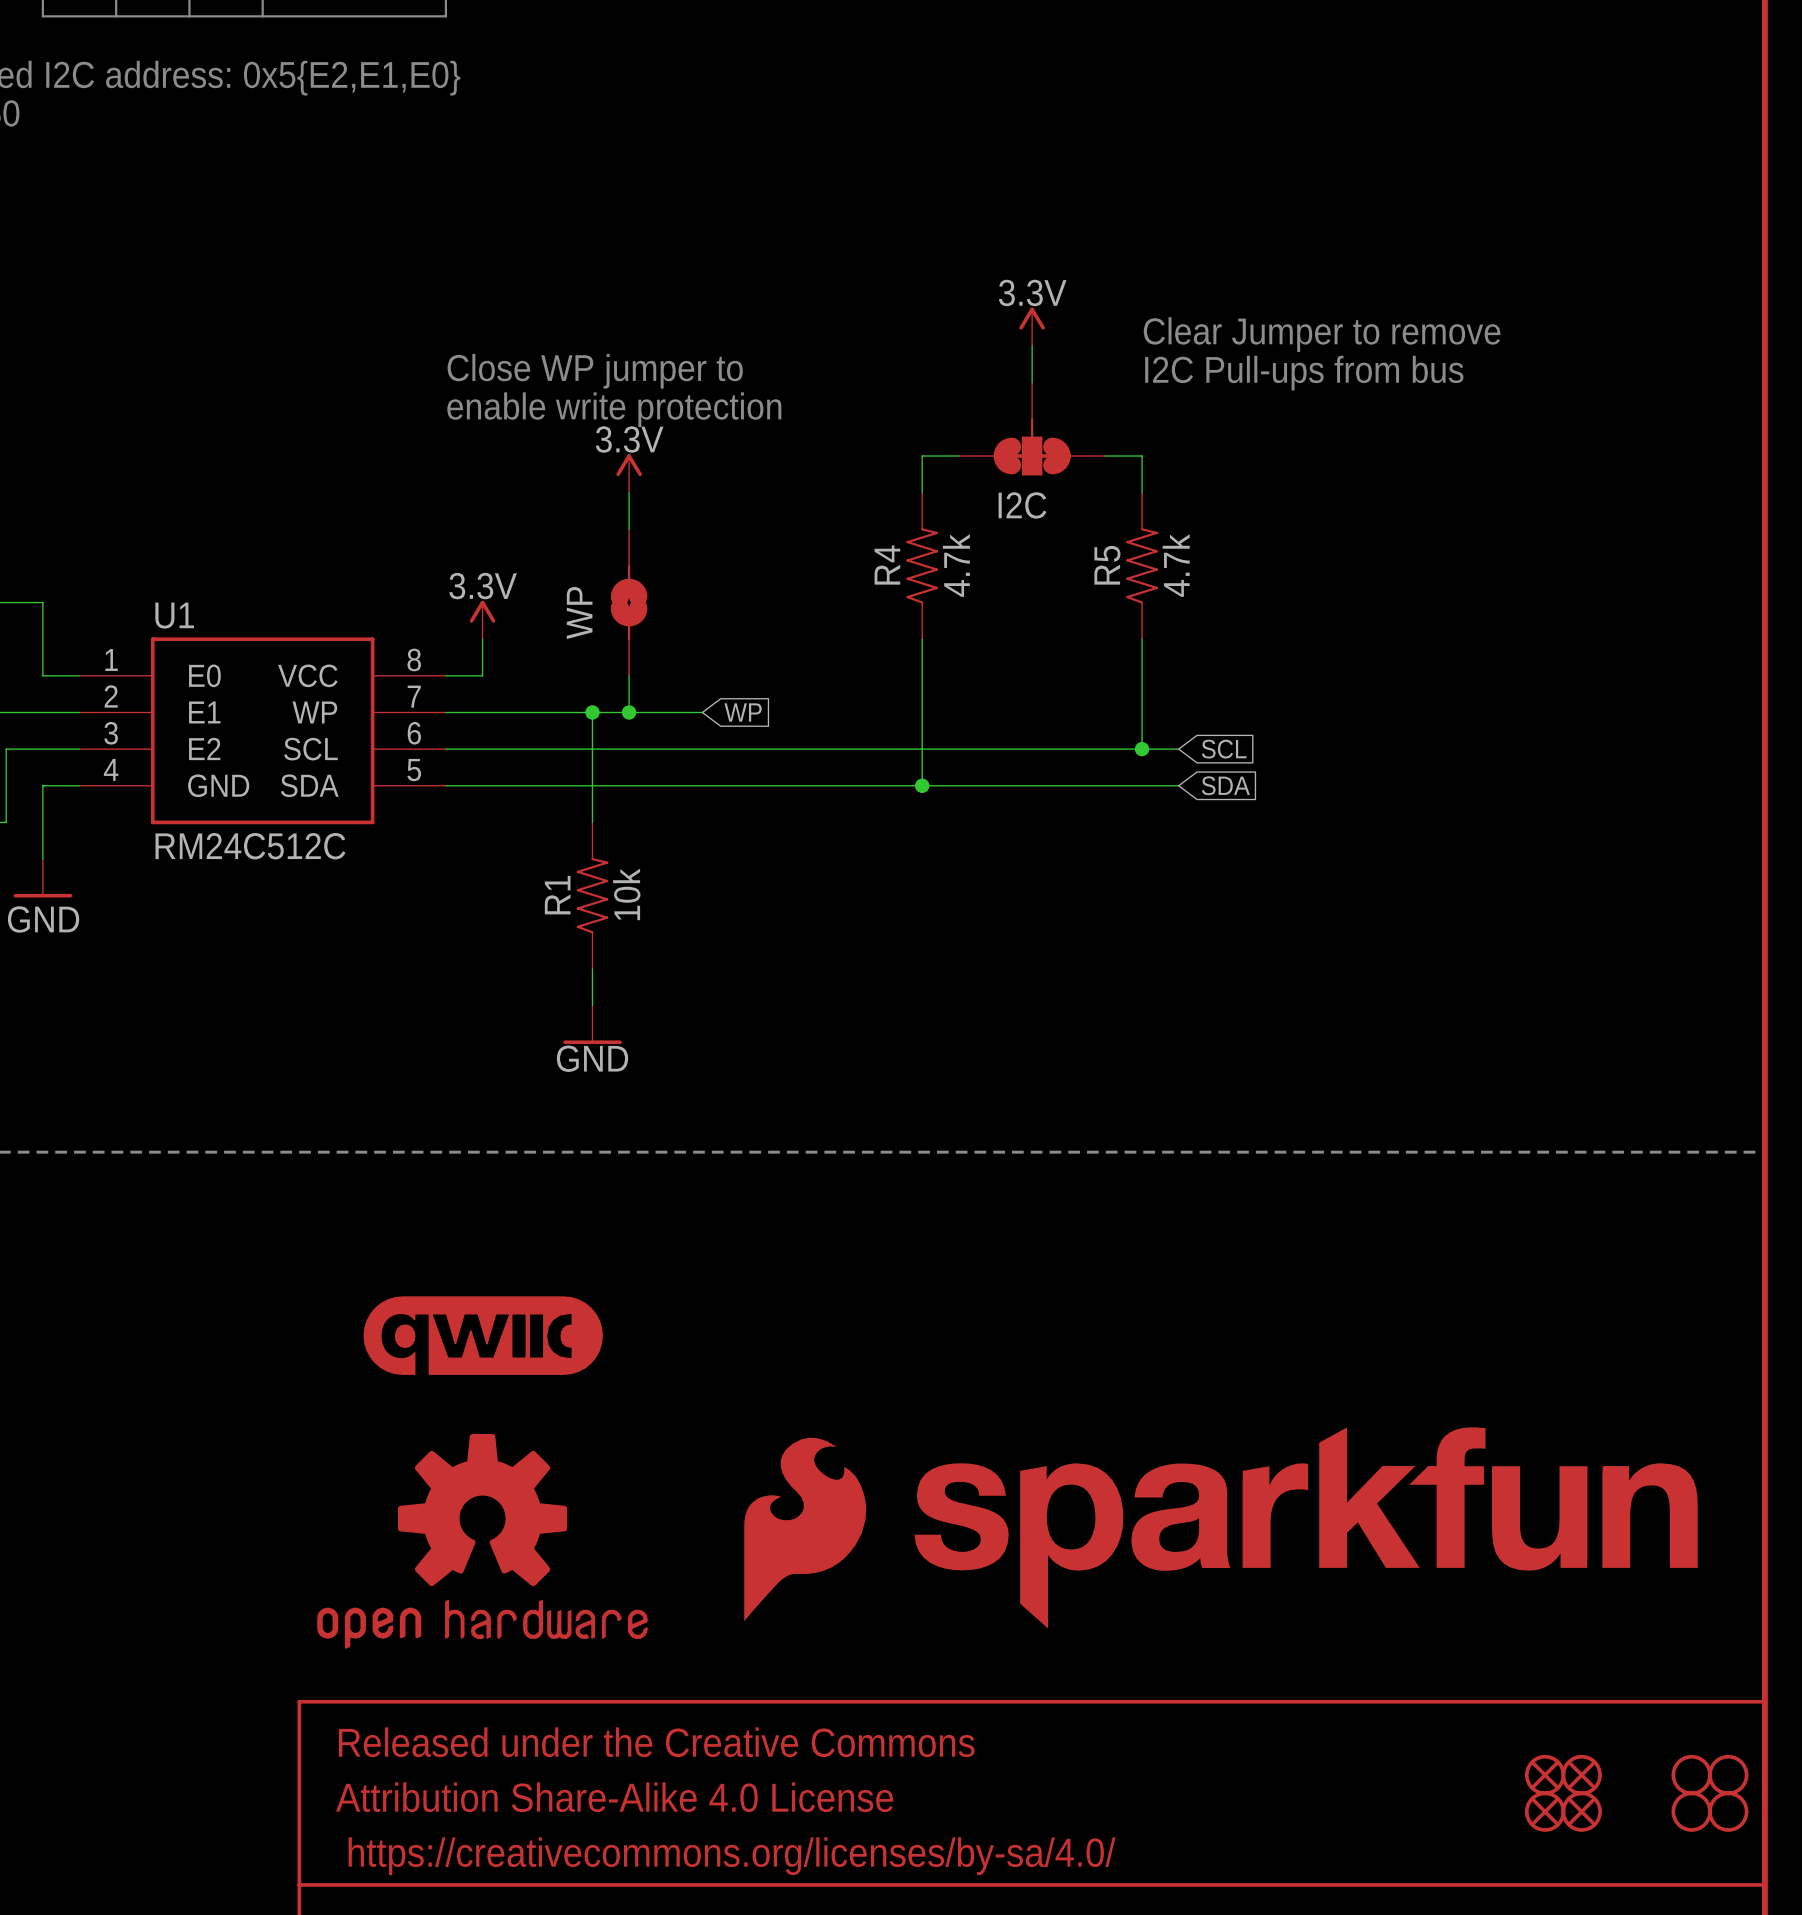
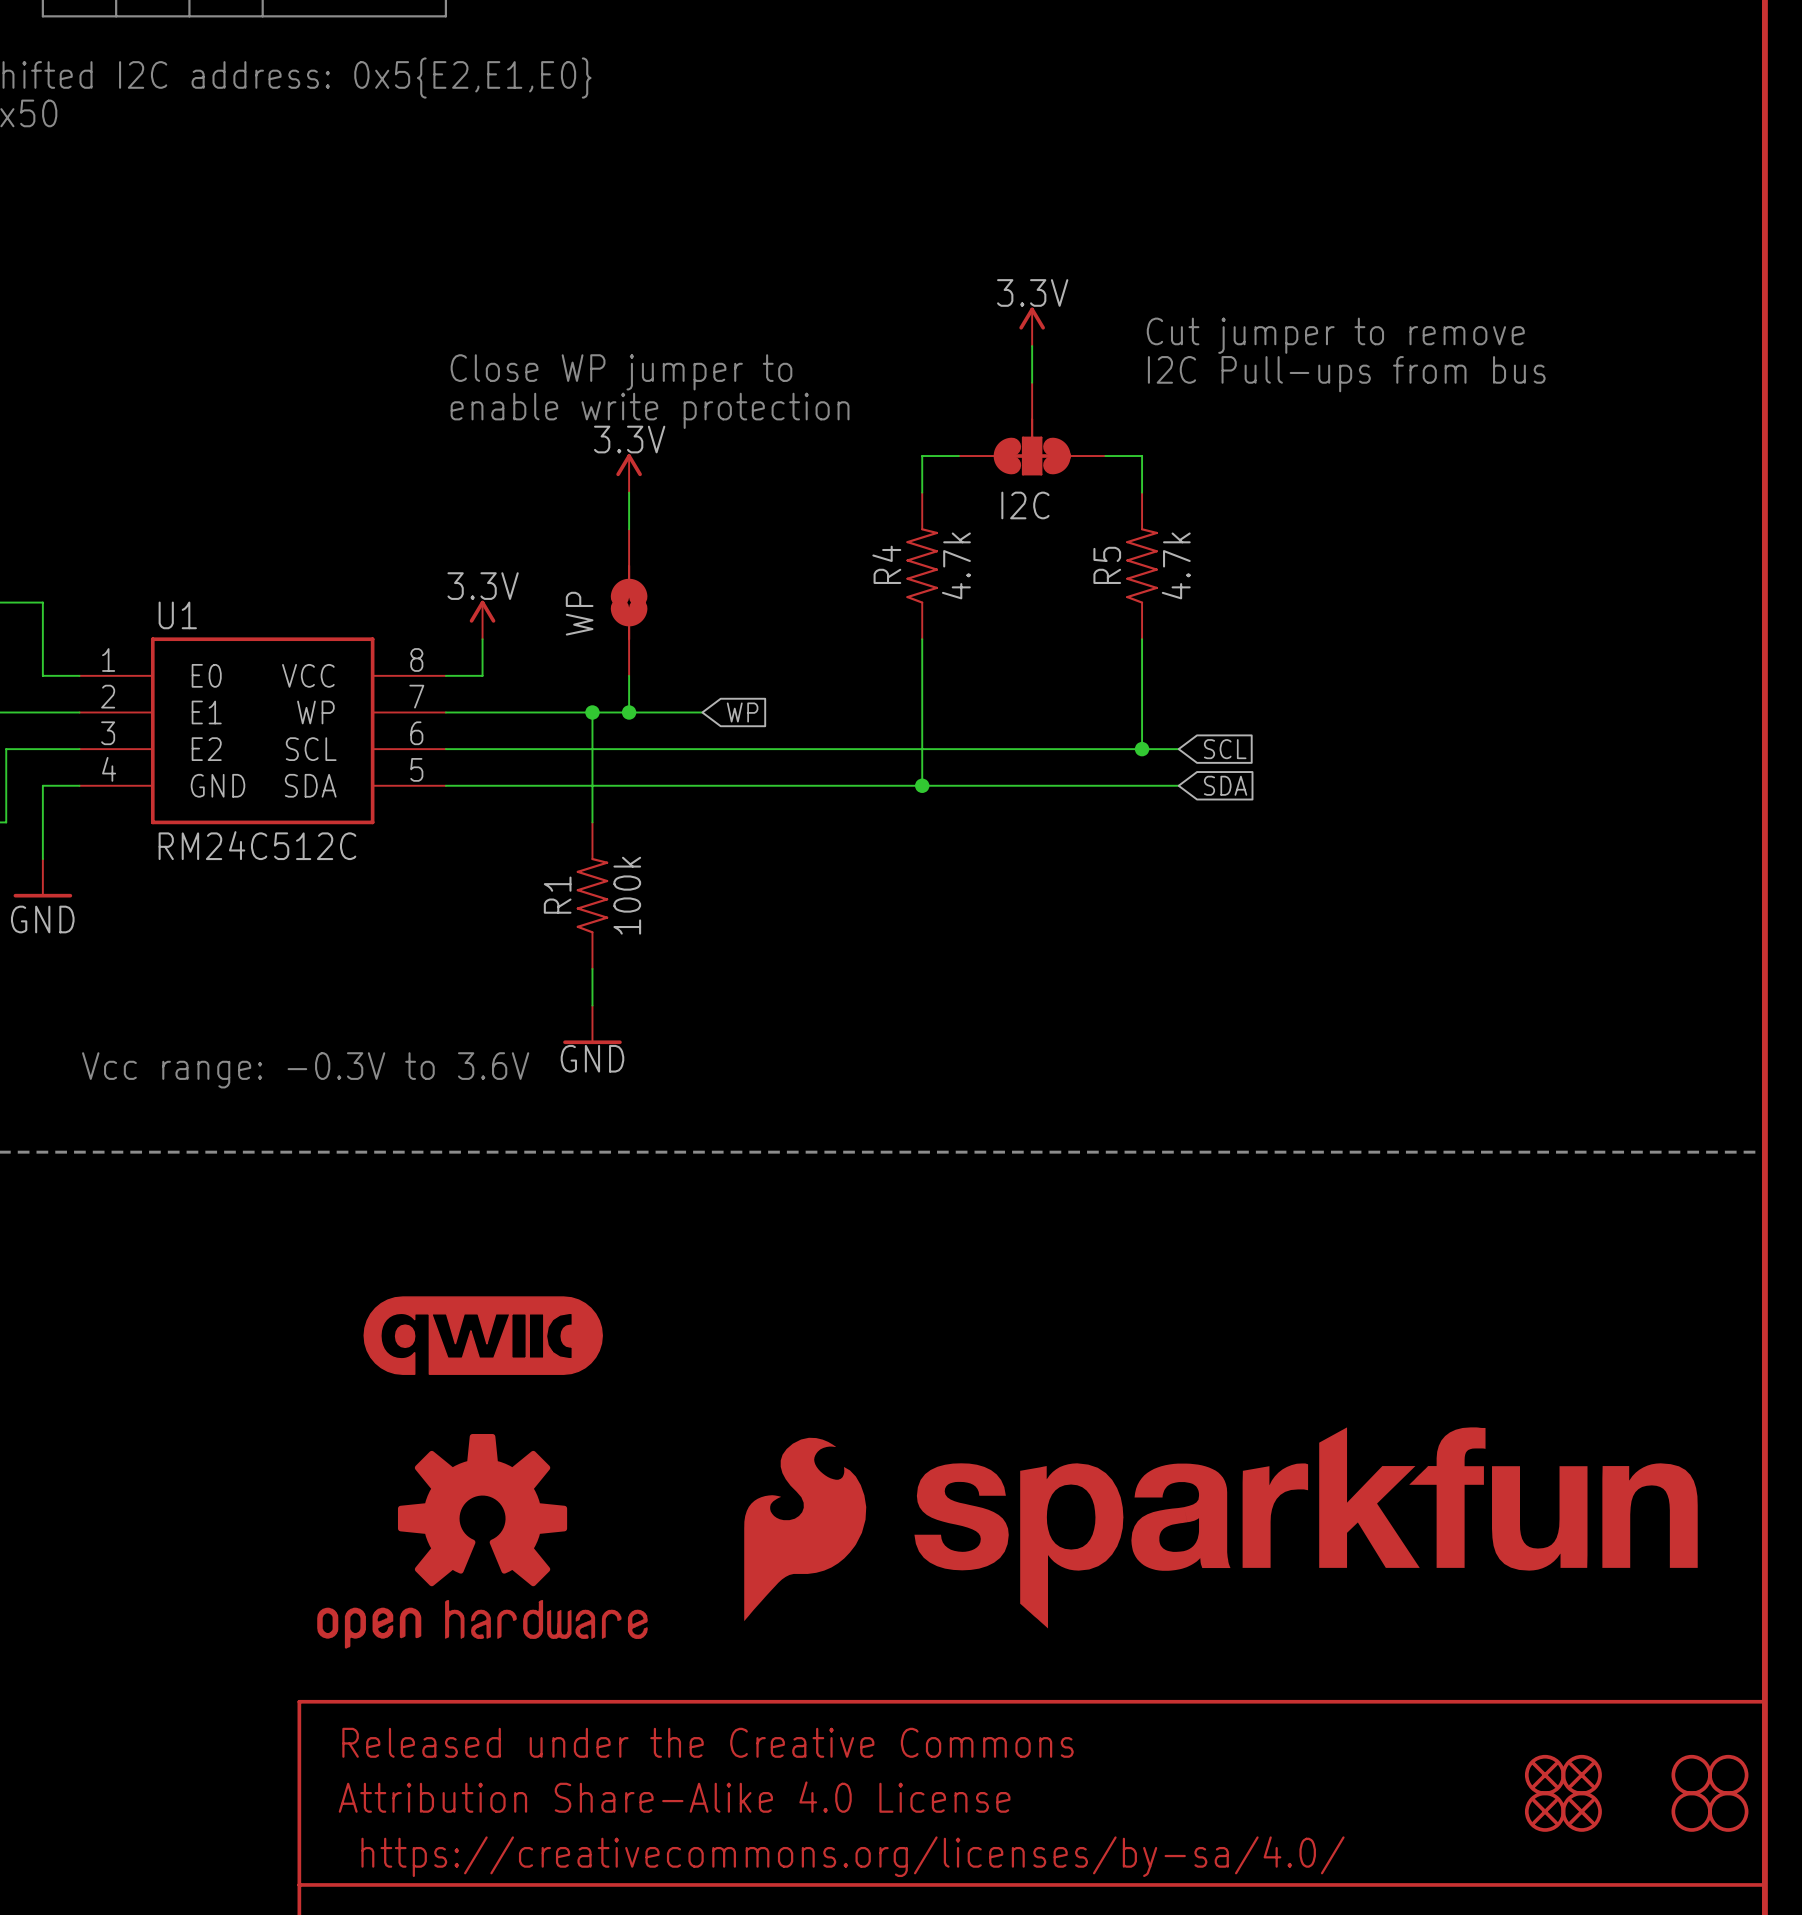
text: Clear Jumper to remove (1322, 334) -> Cut jumper to remove (1335, 335)
R1 value: 10k (626, 894) -> 100k (627, 895)
text: none -> Vcc range: -0.3V to 3.6V (305, 1070)

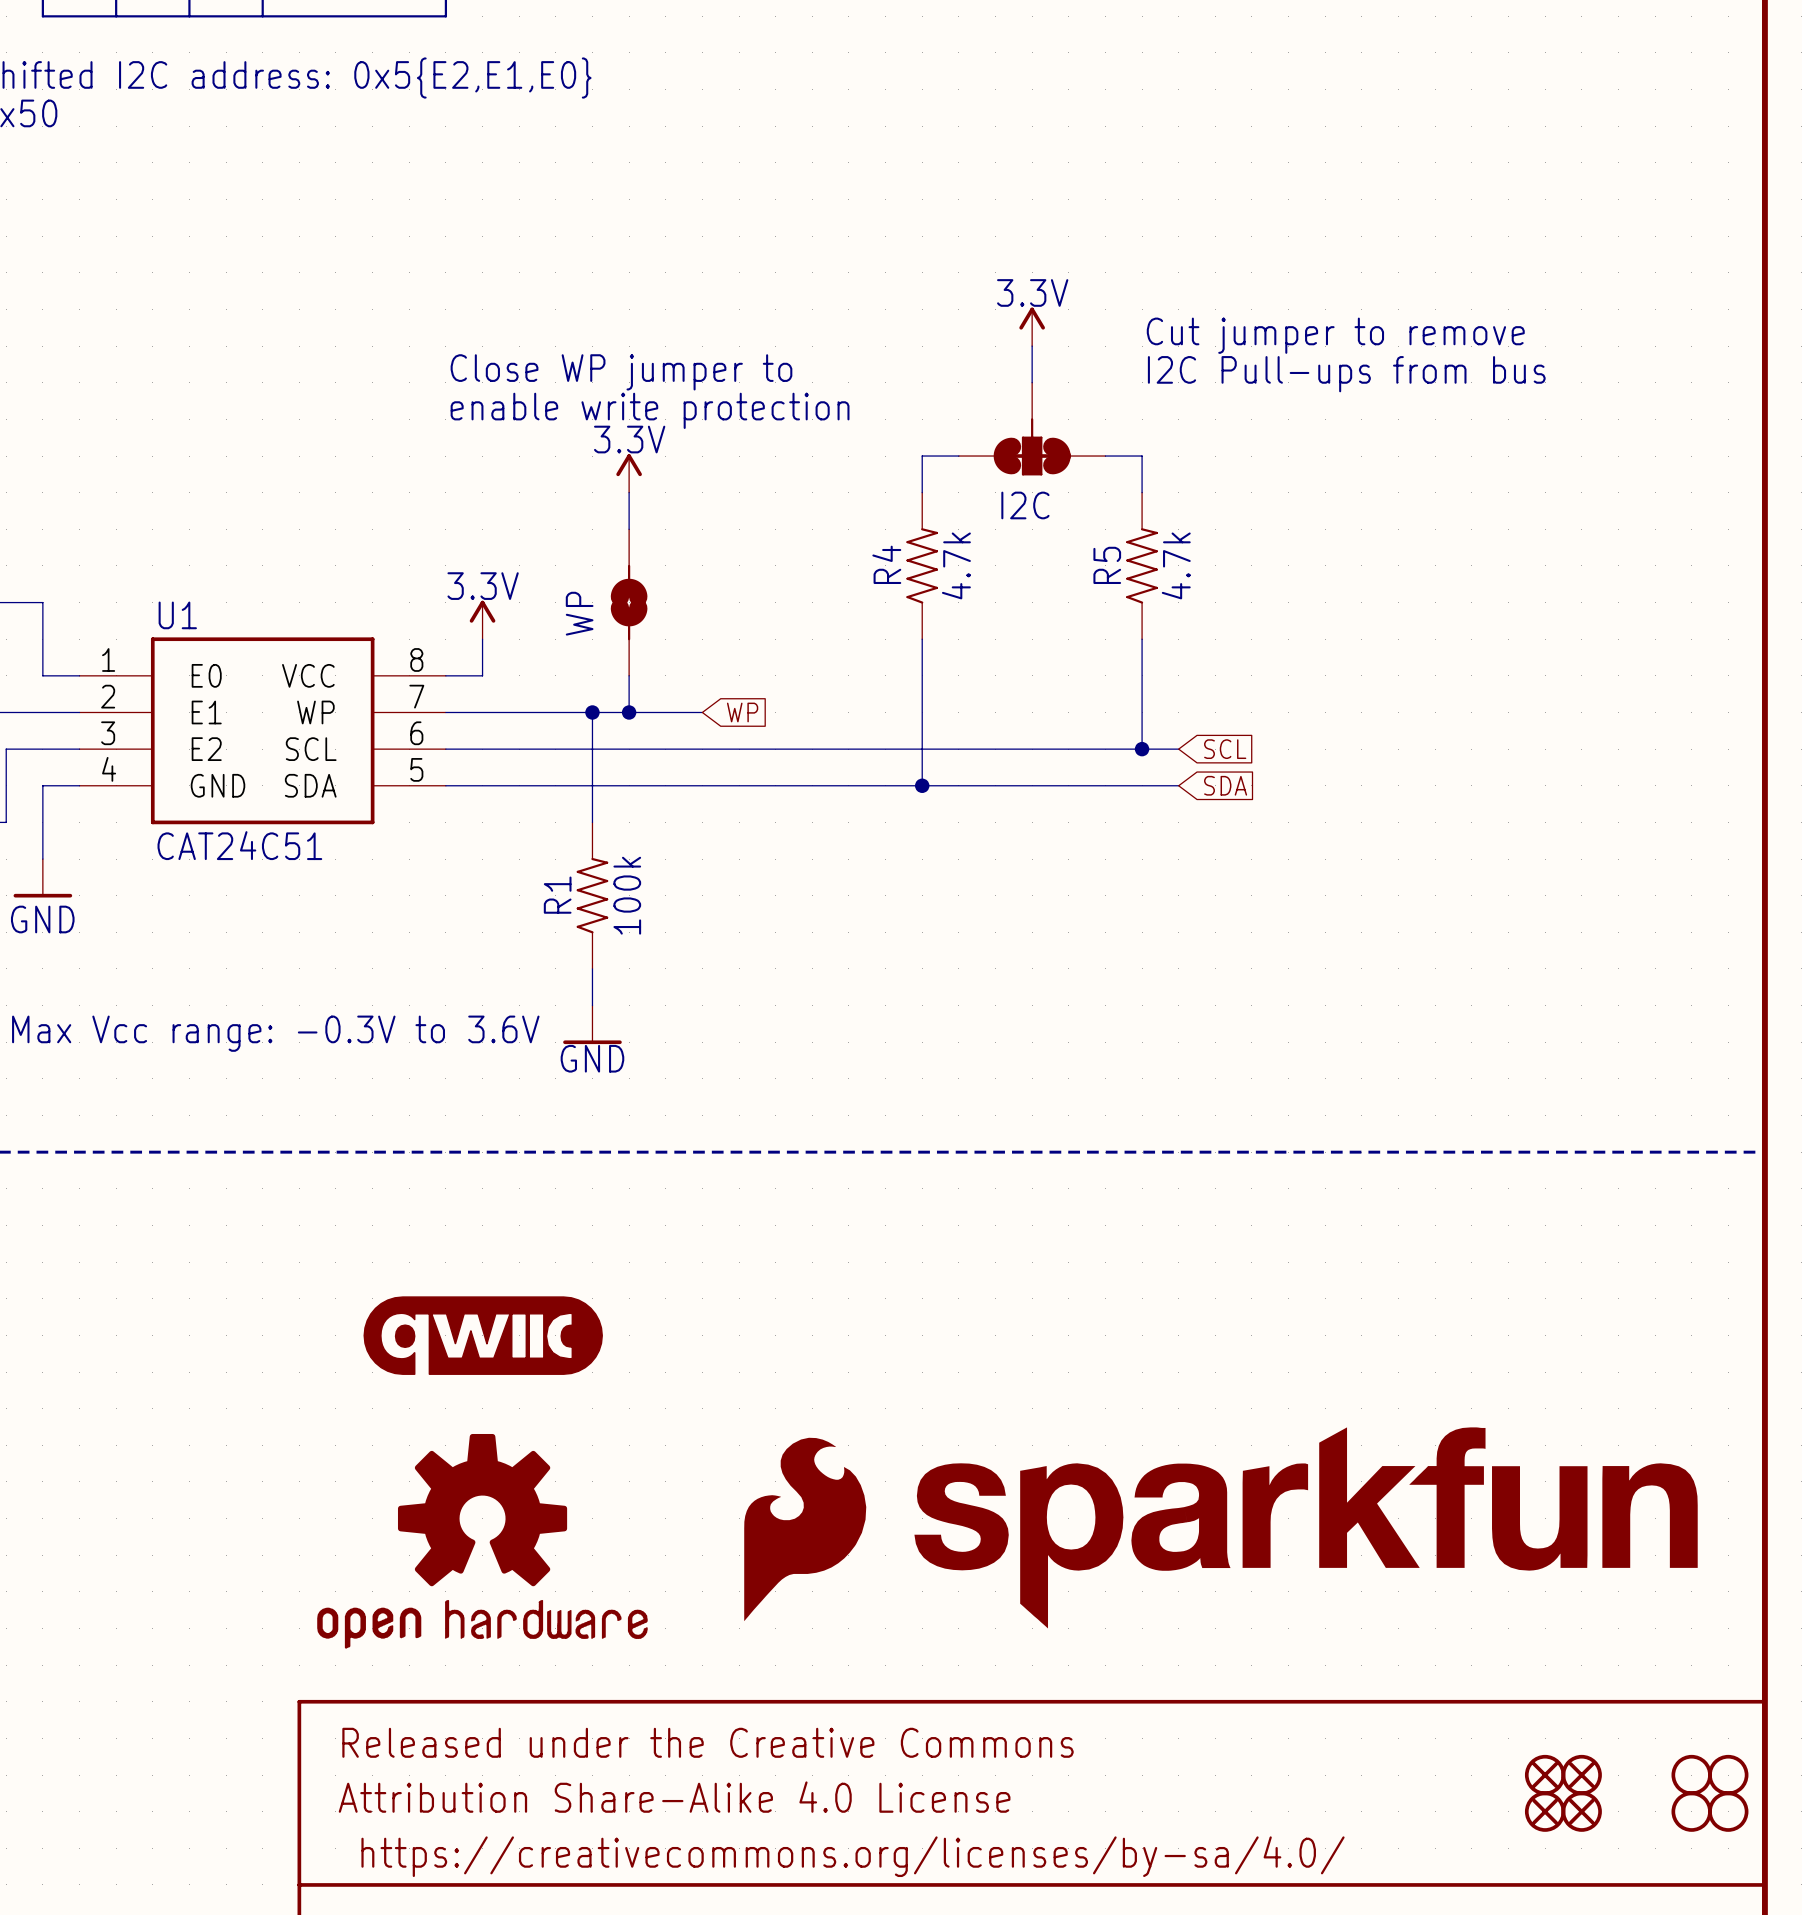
U1 value: RM24C512C (257, 845) -> CAT24C51 (239, 845)
text: Vcc range: -0.3V to 3.6V (305, 1070) -> Max Vcc range: -0.3V to 3.6V (275, 1033)

